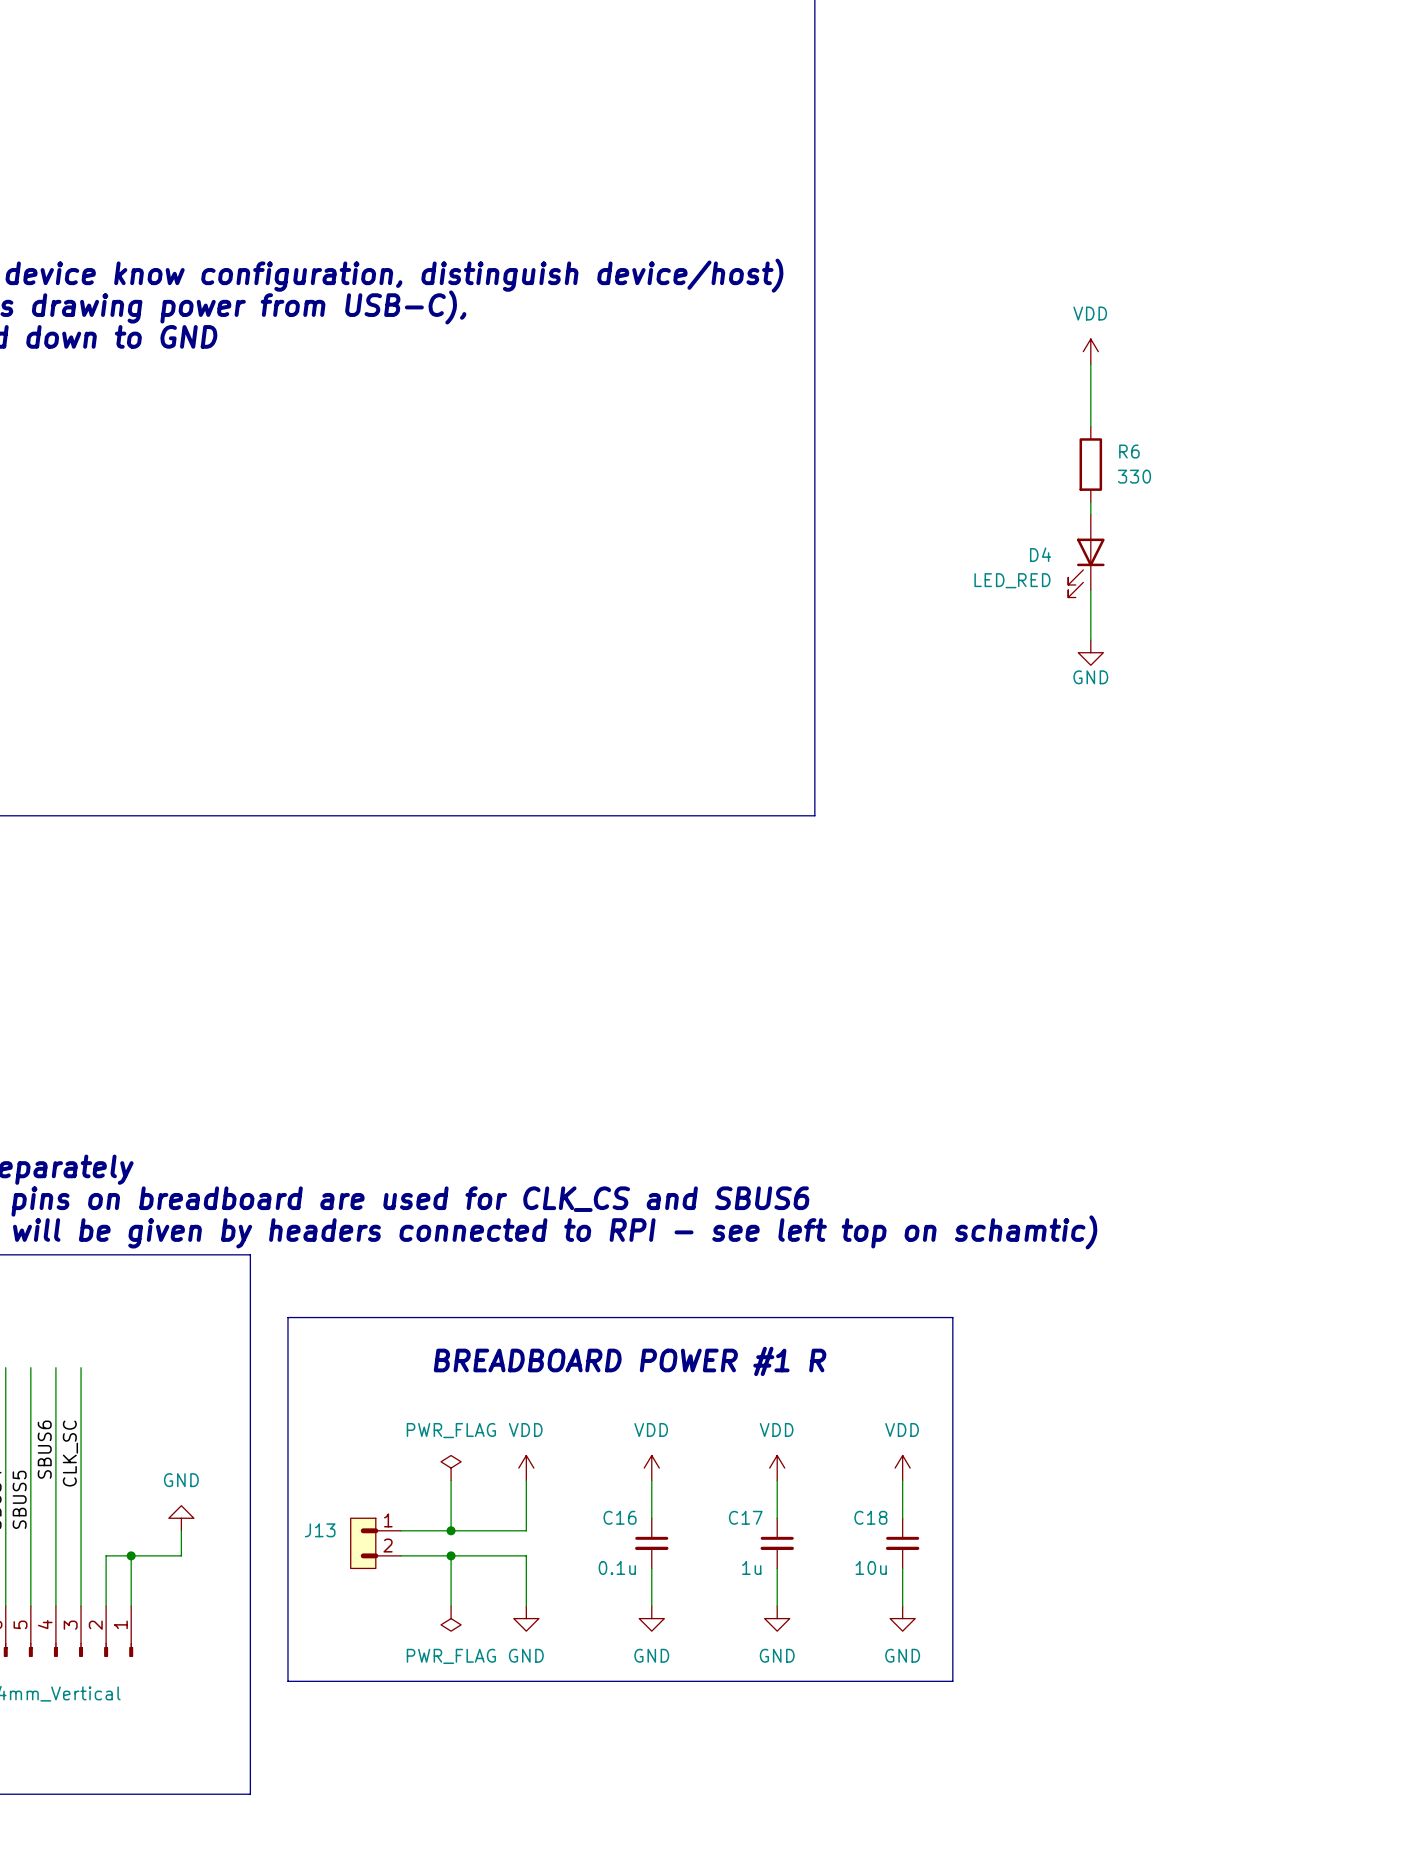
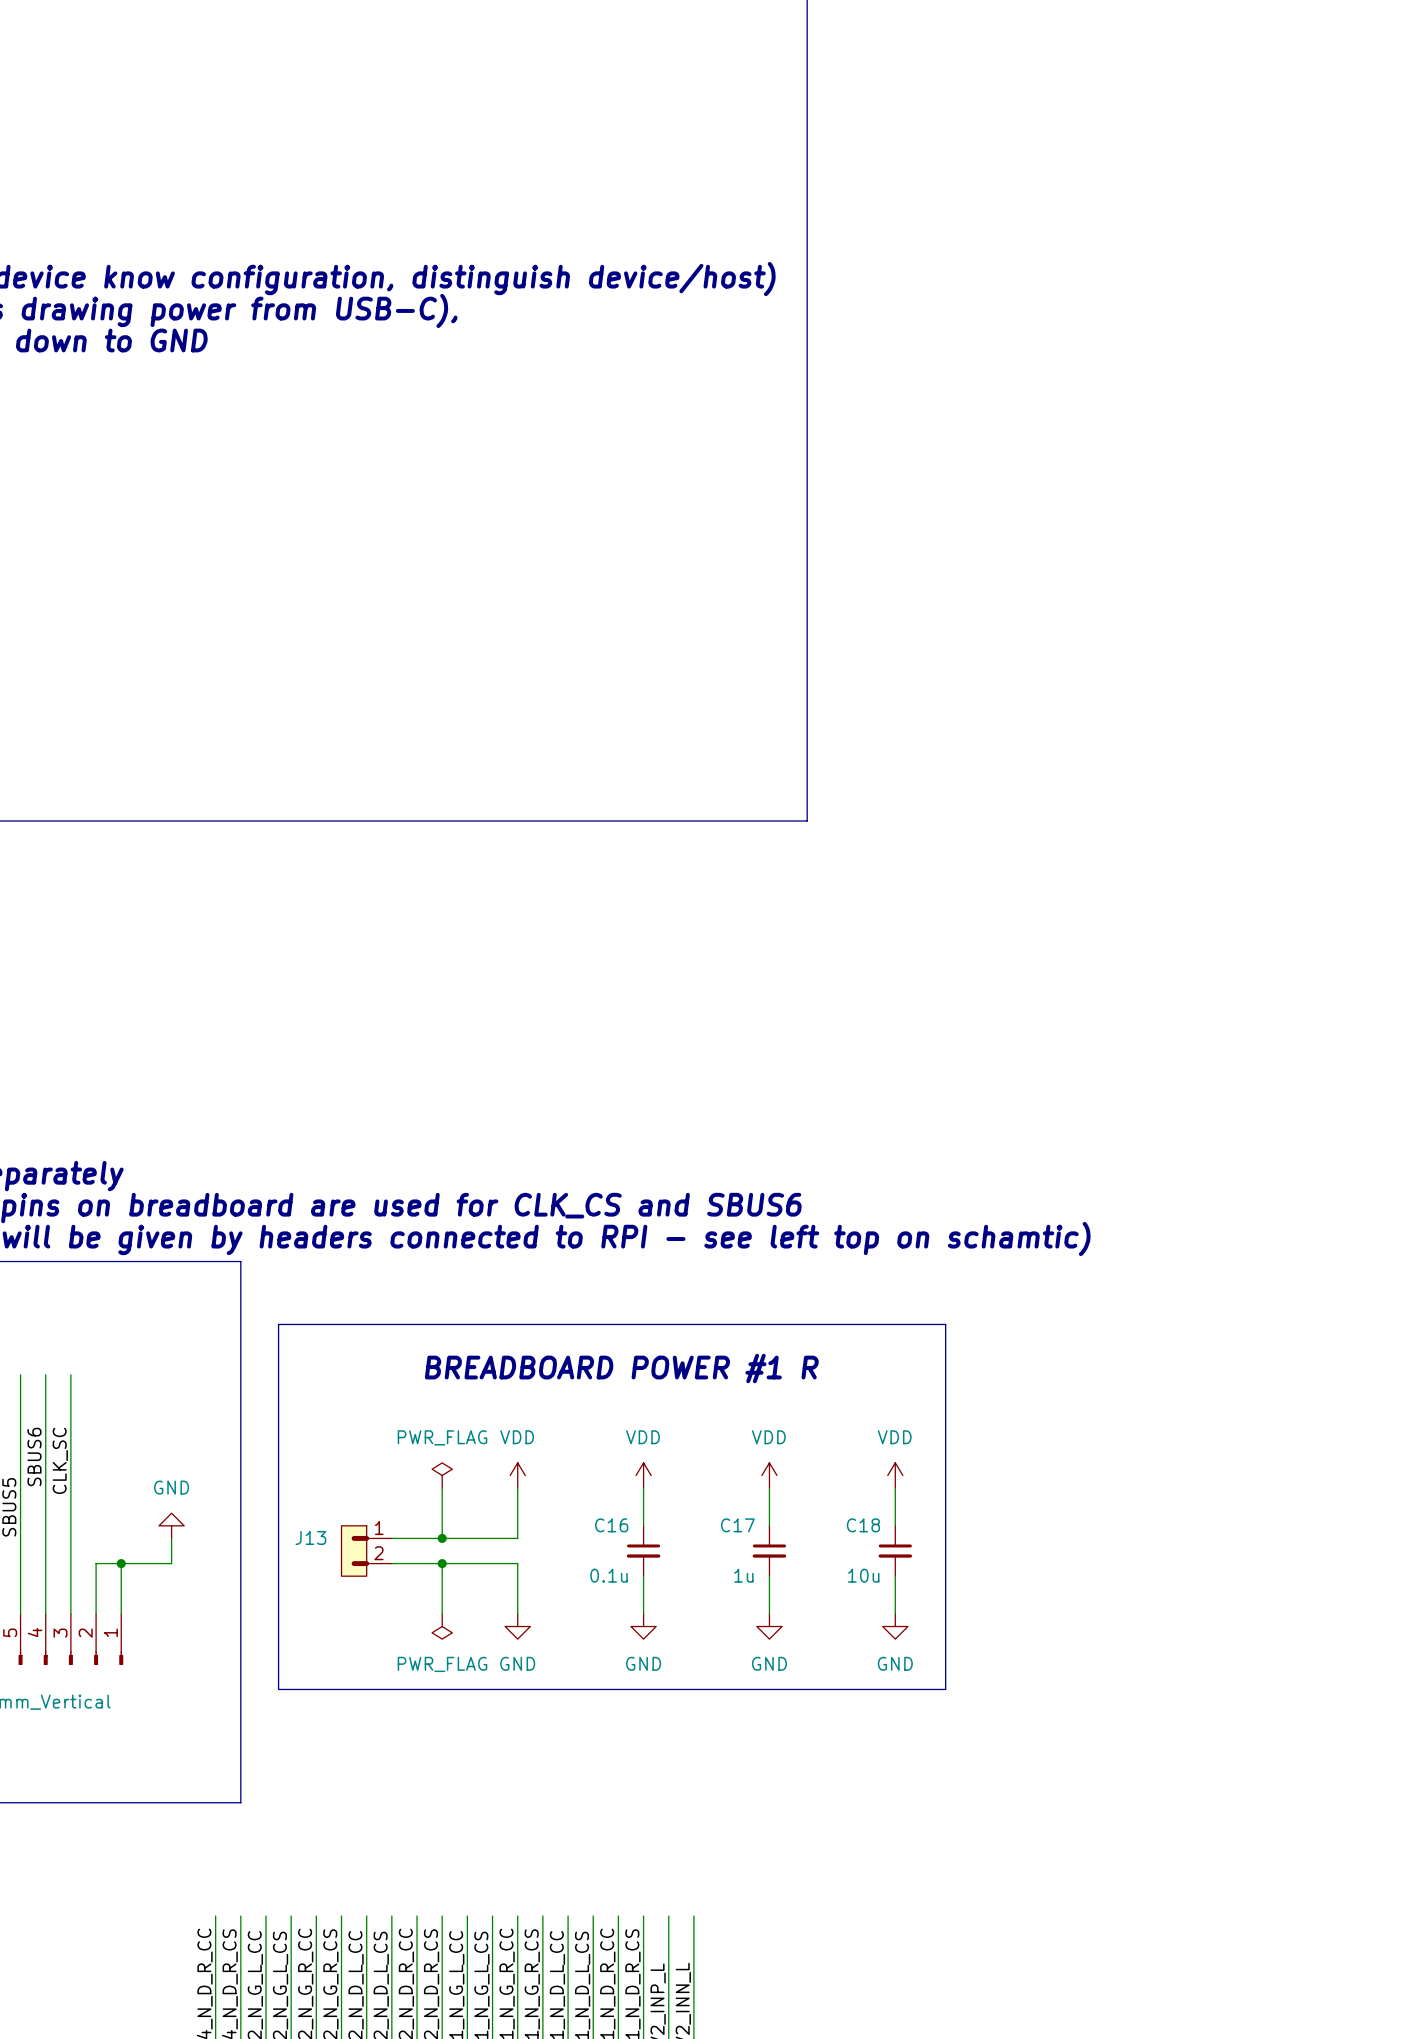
power symbol: VDD (1090, 351) -> none
wire: (1090, 364) (1090, 426) -> none
R6: 330 (1090, 464) -> none
wire: (1090, 502) (1090, 514) -> none
D4: LED_RED (1086, 556) -> none
wire: (1090, 590) (1090, 640) -> none
power symbol: GND (1090, 652) -> none

